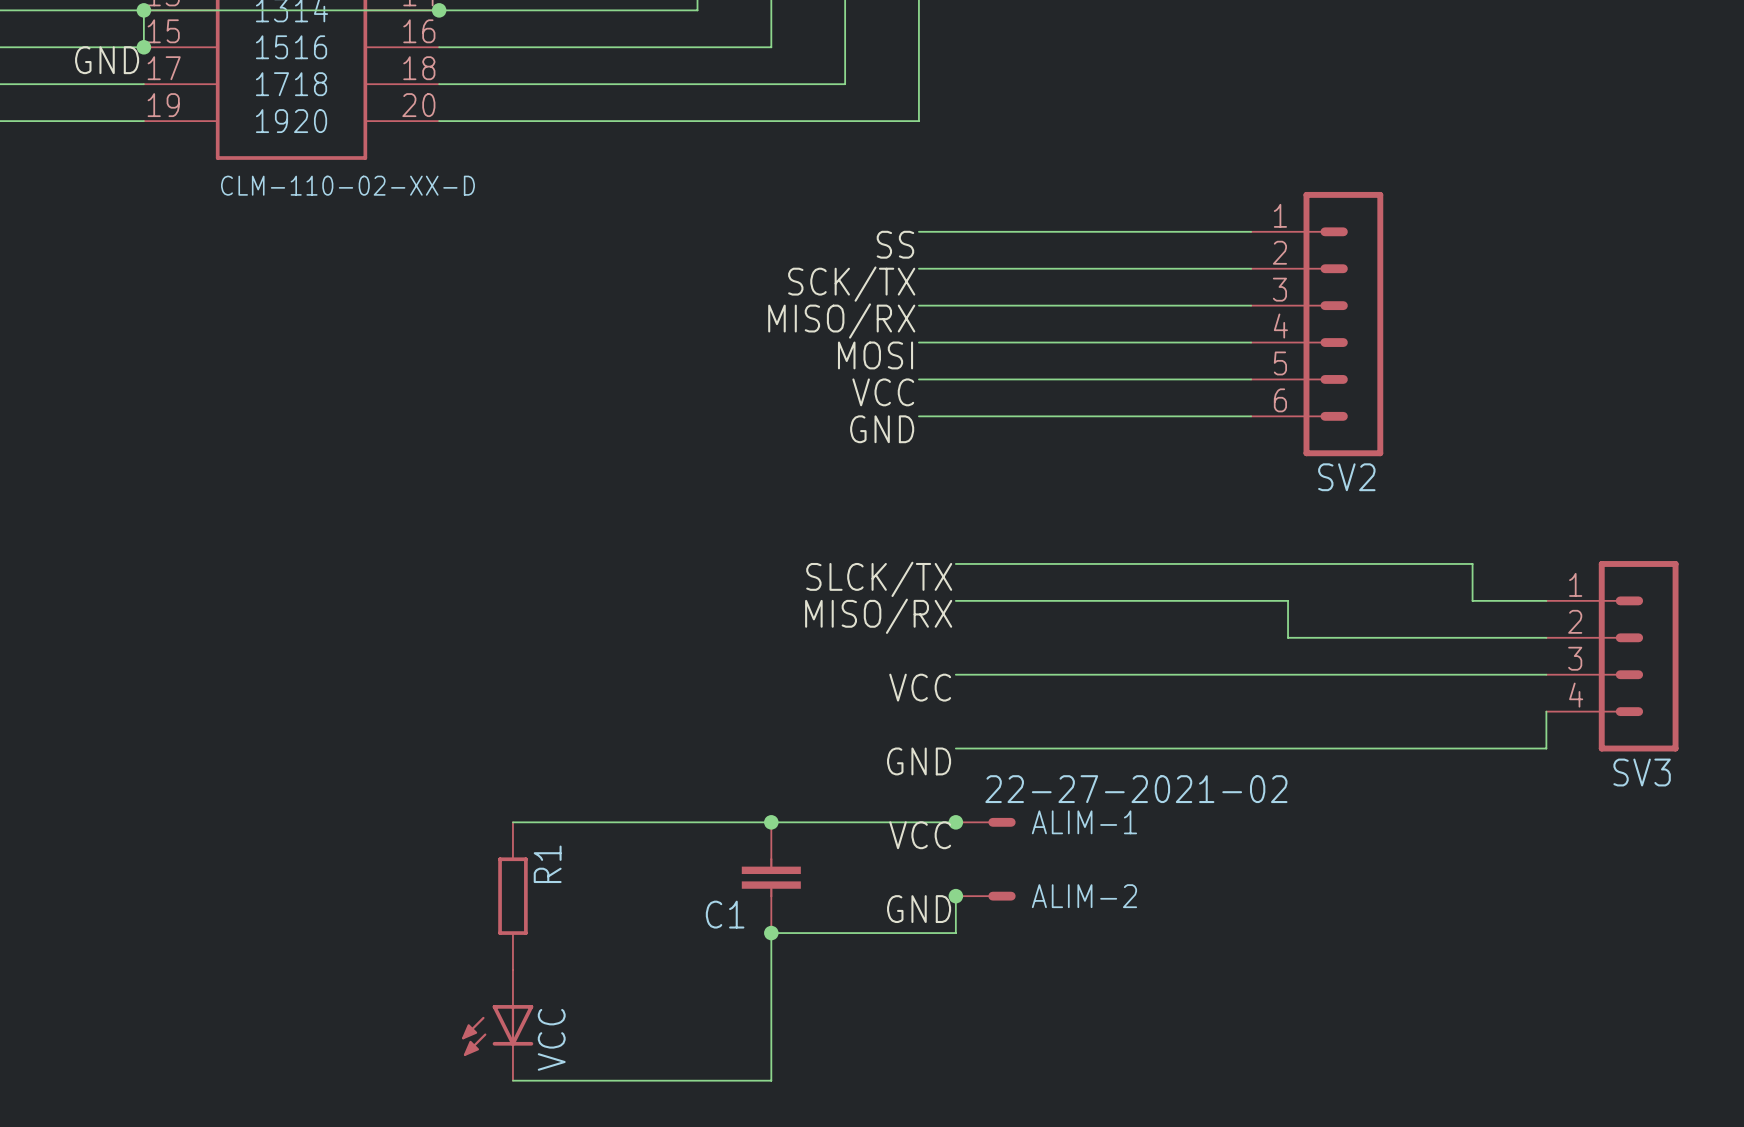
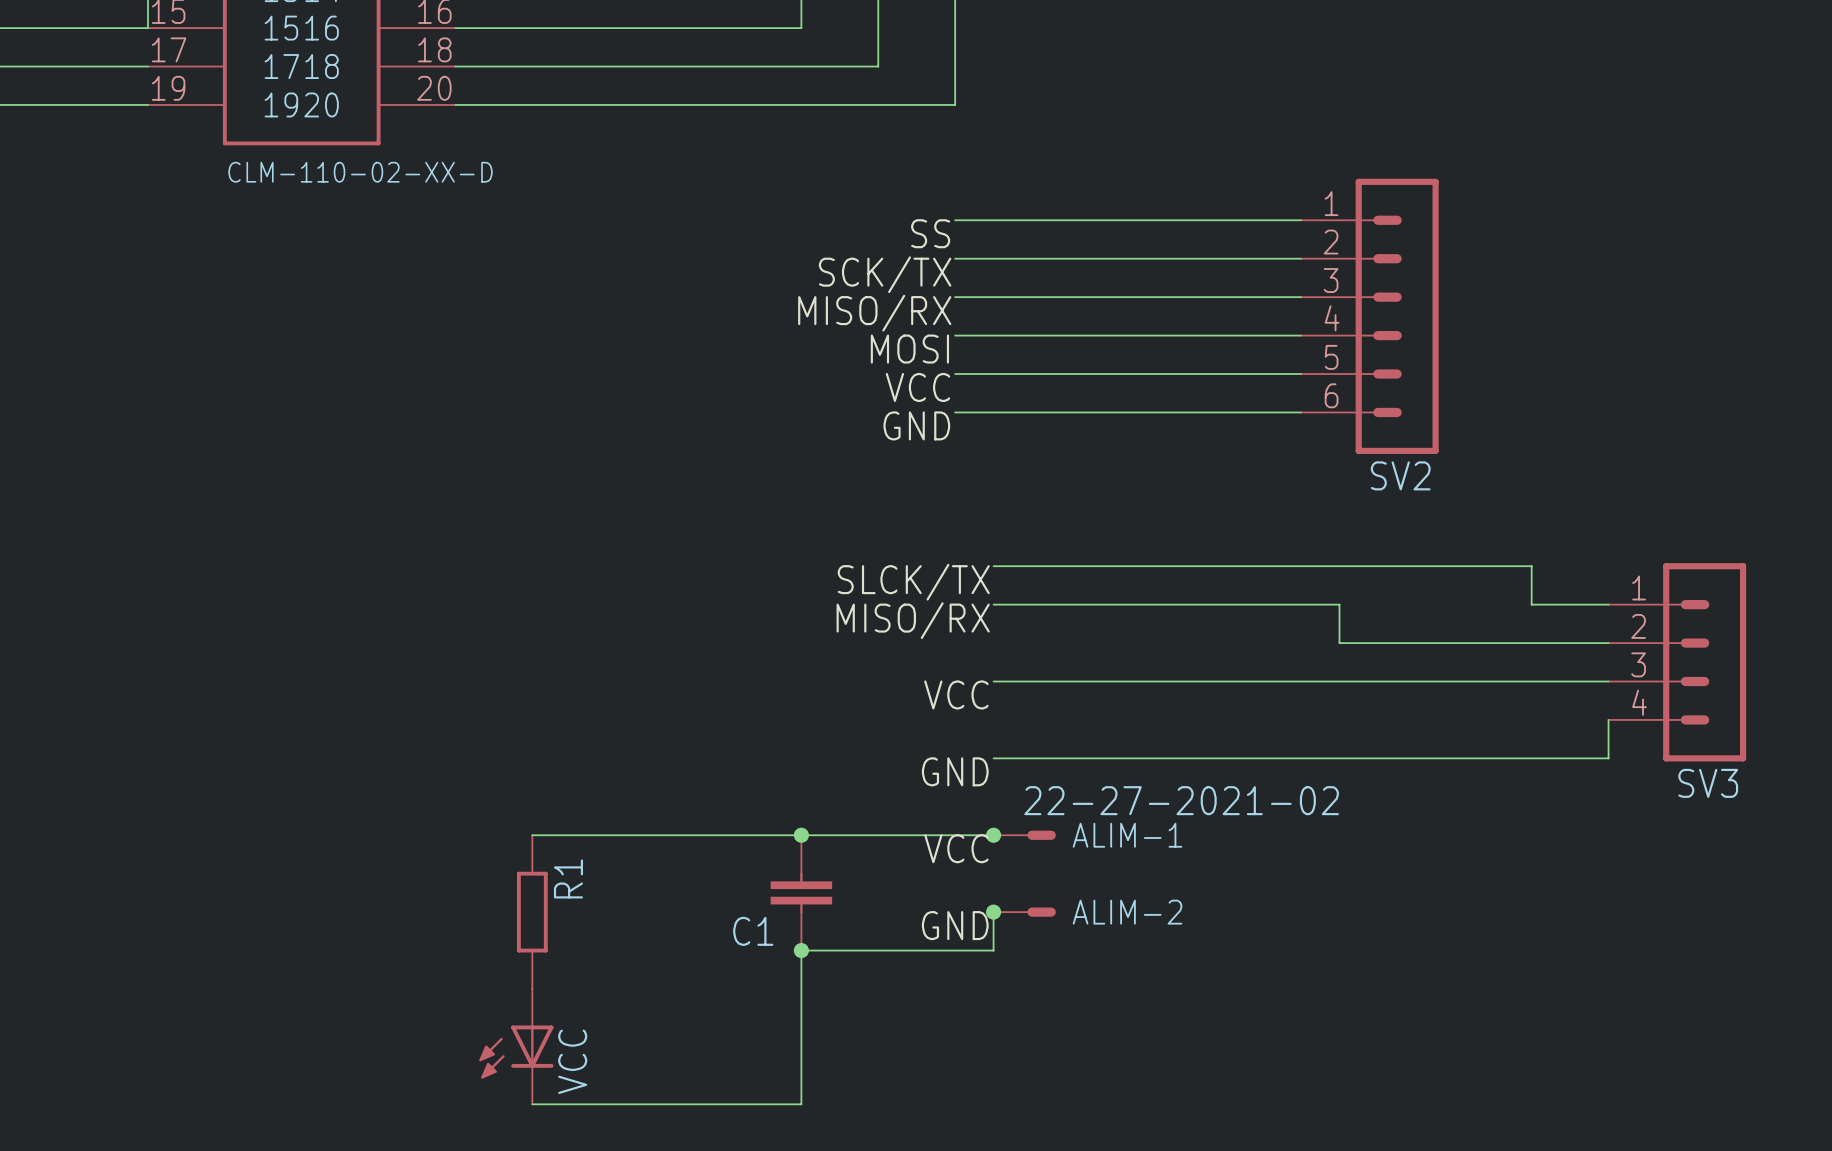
junction: (143, 47) -> none
label: GND (107, 60) -> none

